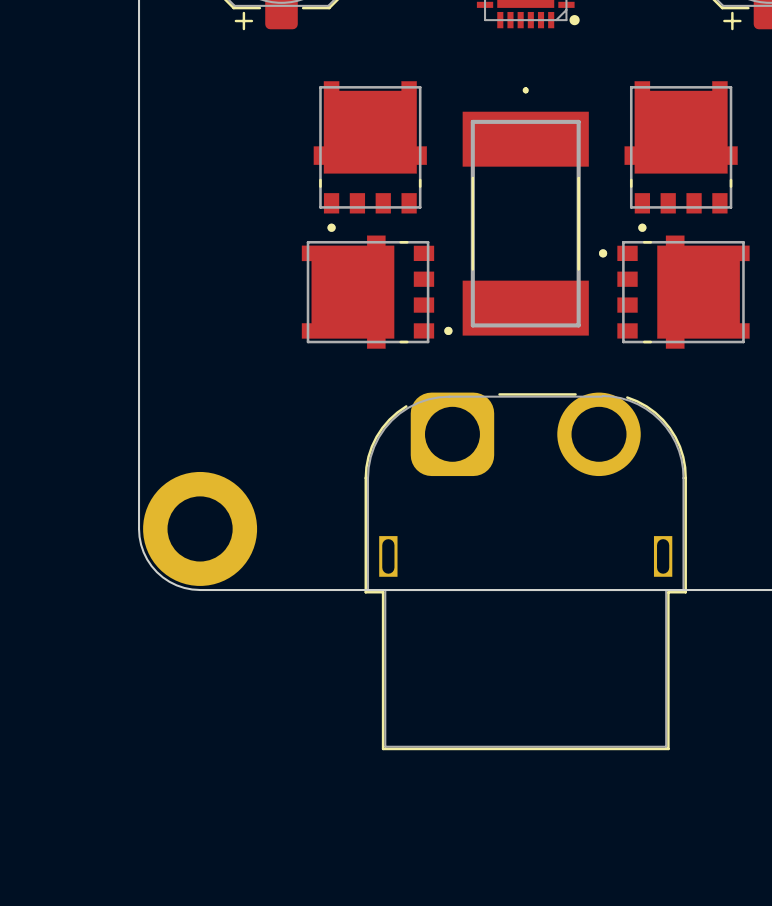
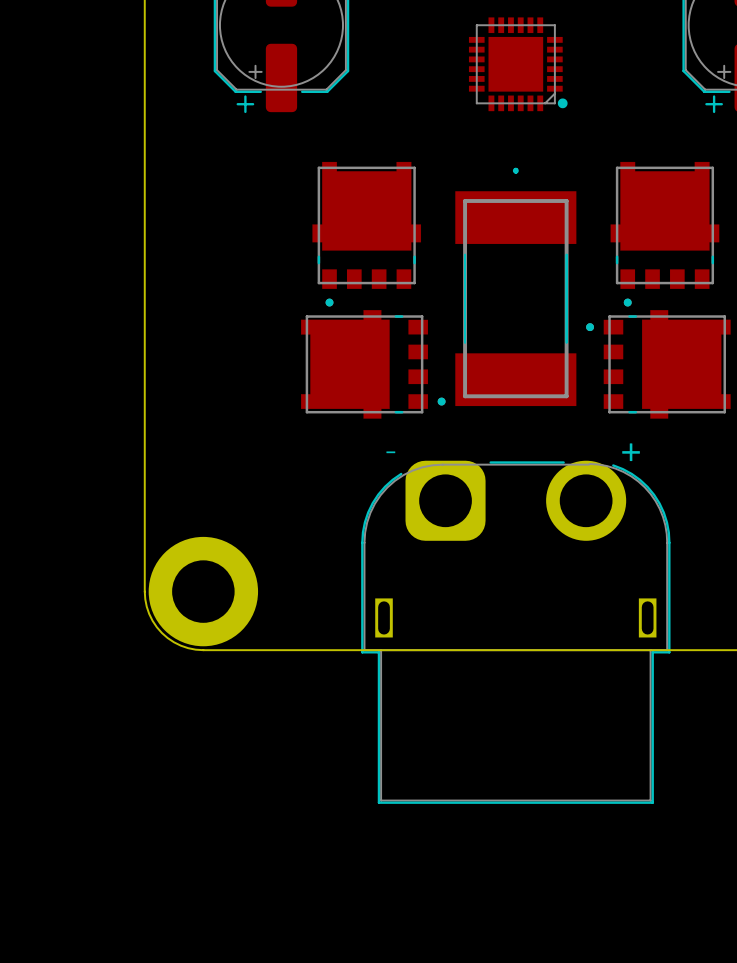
part text: none -> - (390, 452)
part text: none -> + (631, 452)

